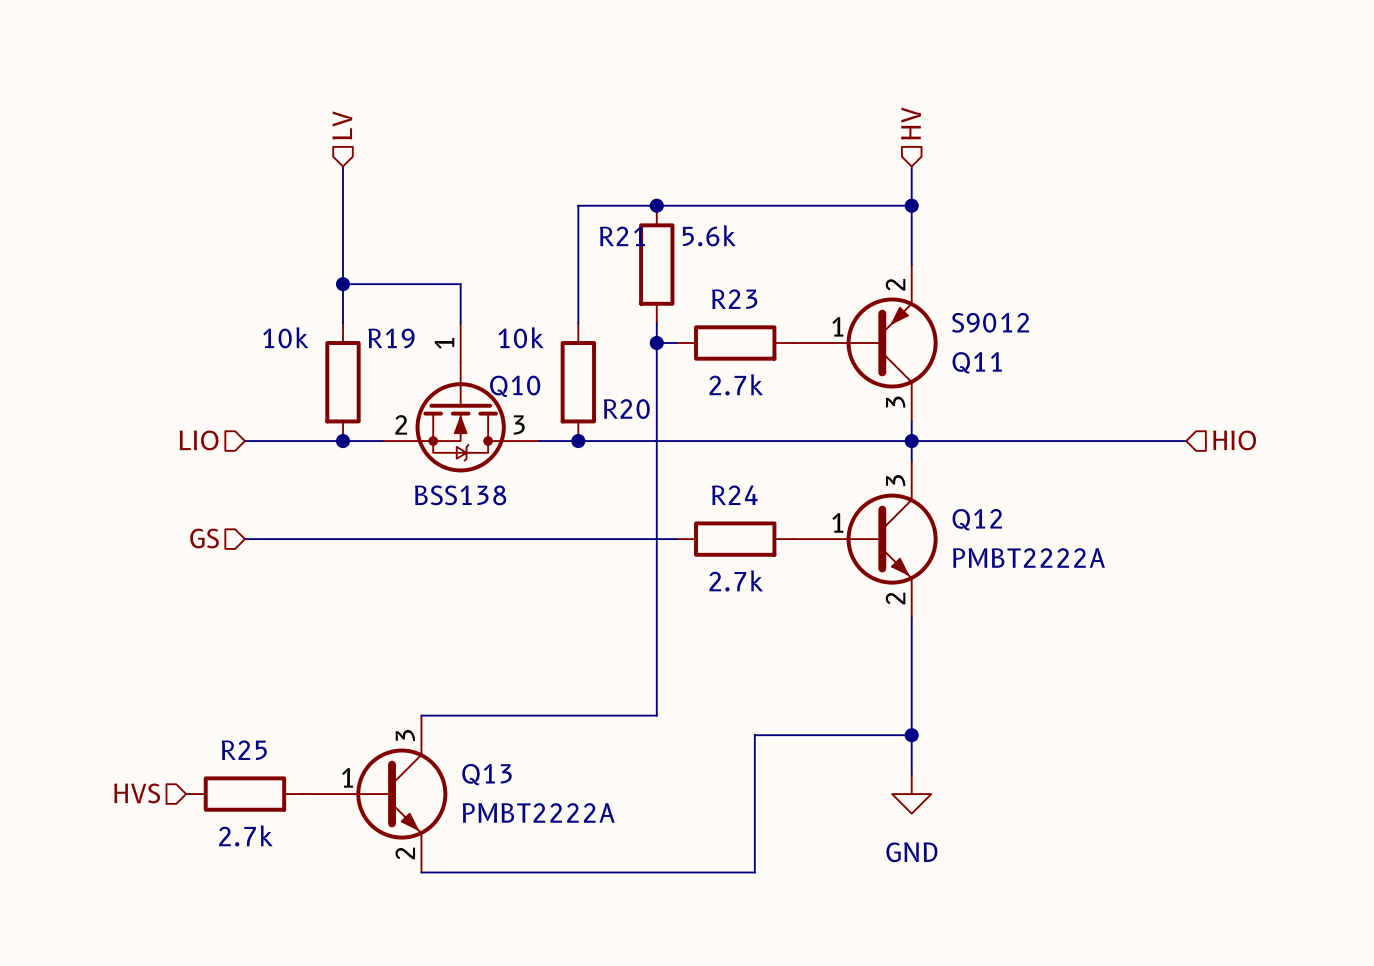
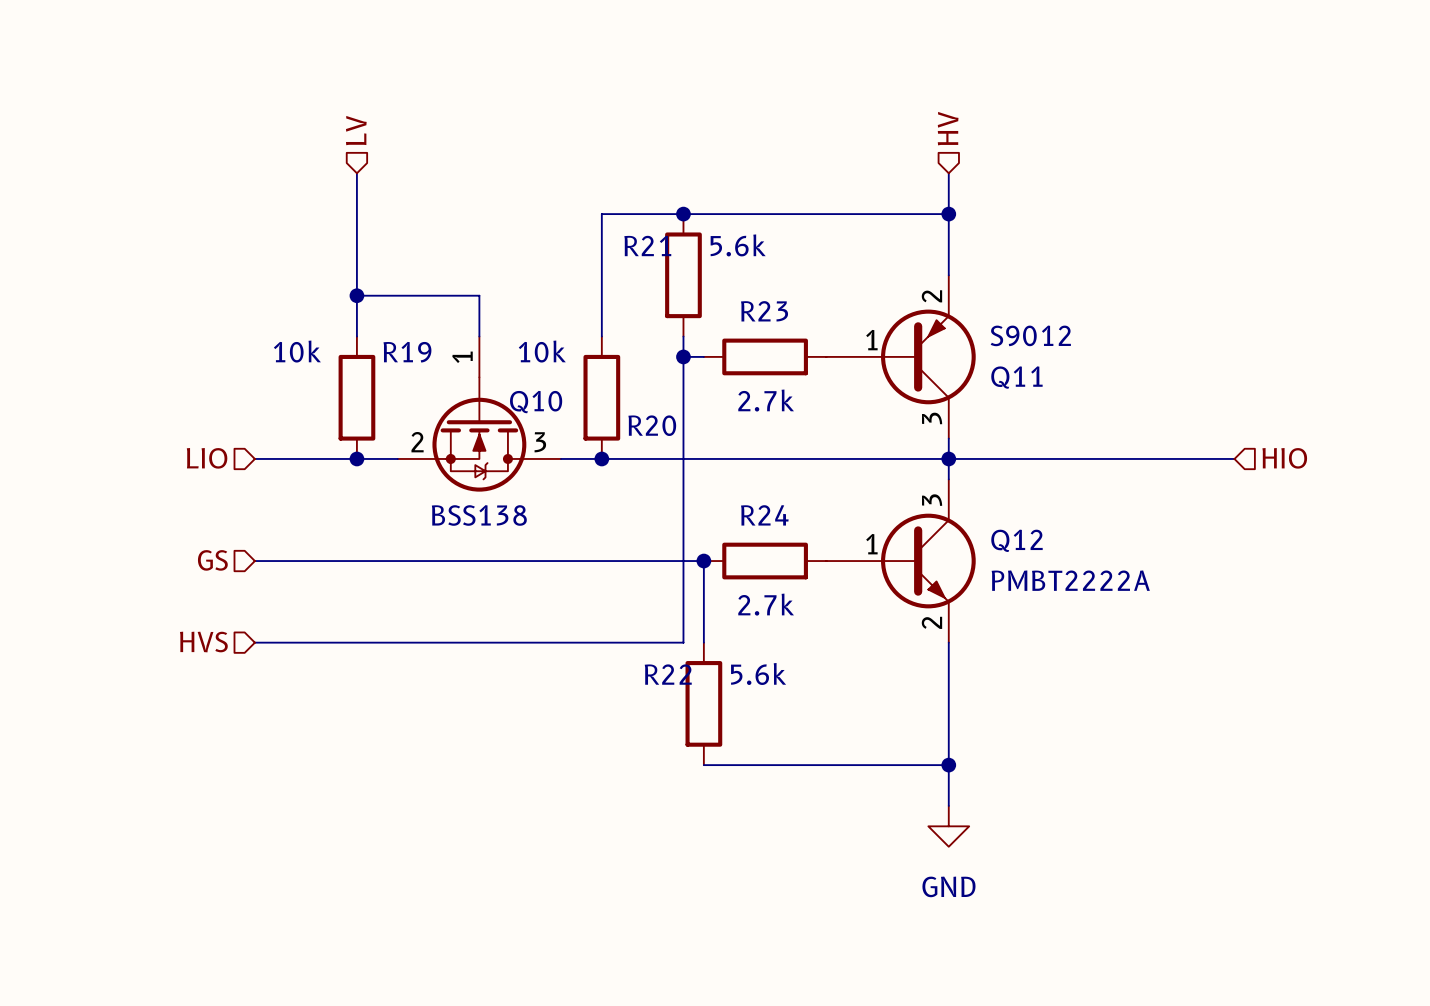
wire: none -> (703, 561) (703, 642)
junction: none -> (703, 561)
wire: (656, 617) (656, 715) (421, 715) -> (683, 642) (254, 642)
R22: none -> 5.6k (703, 703)
wire: (754, 735) (754, 872) (421, 872) -> (785, 765) (703, 765)
hierarchical label position: HVS (137, 793) -> HVS (203, 642)
R25: 2.7k (244, 794) -> none
Q13: PMBT2222A (375, 794) -> none

